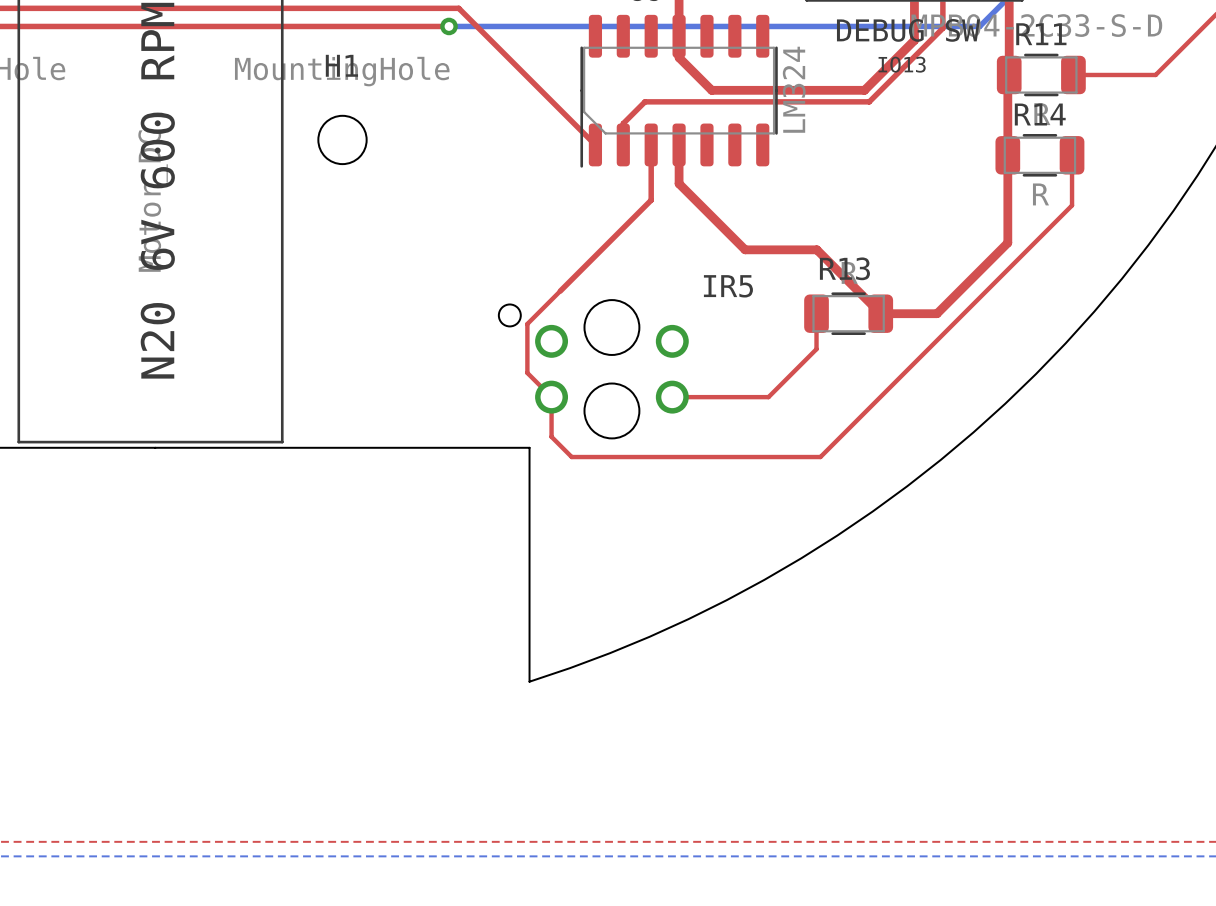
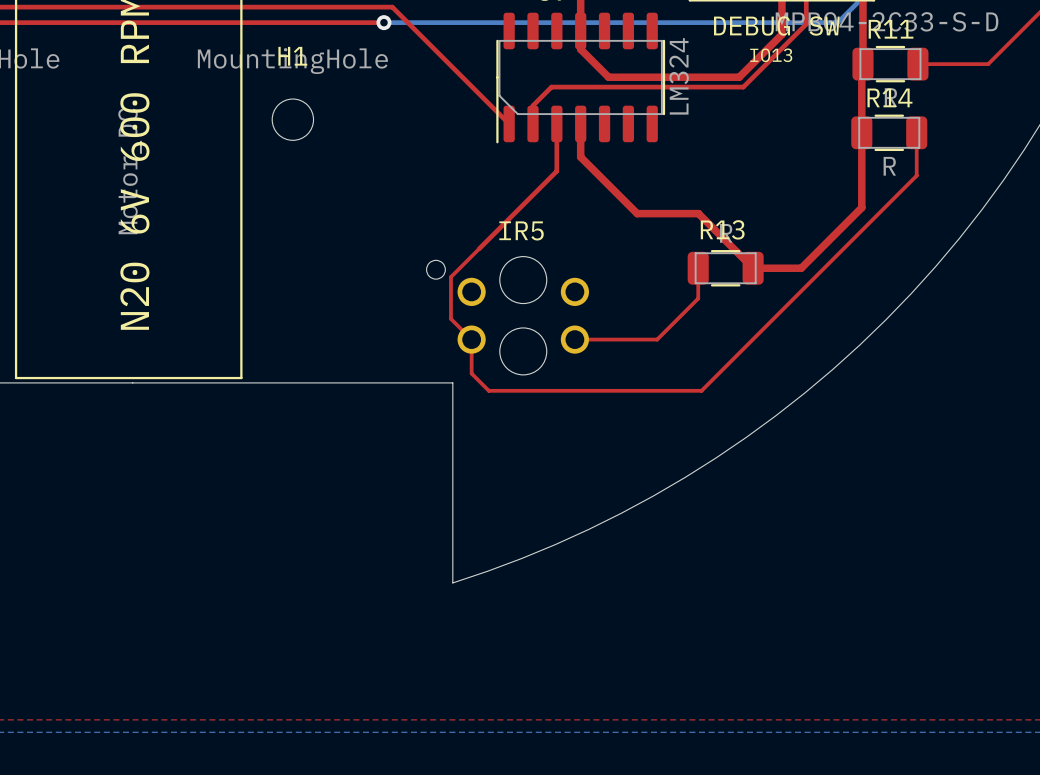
text position: IR5 (728, 286) -> IR5 (521, 230)

